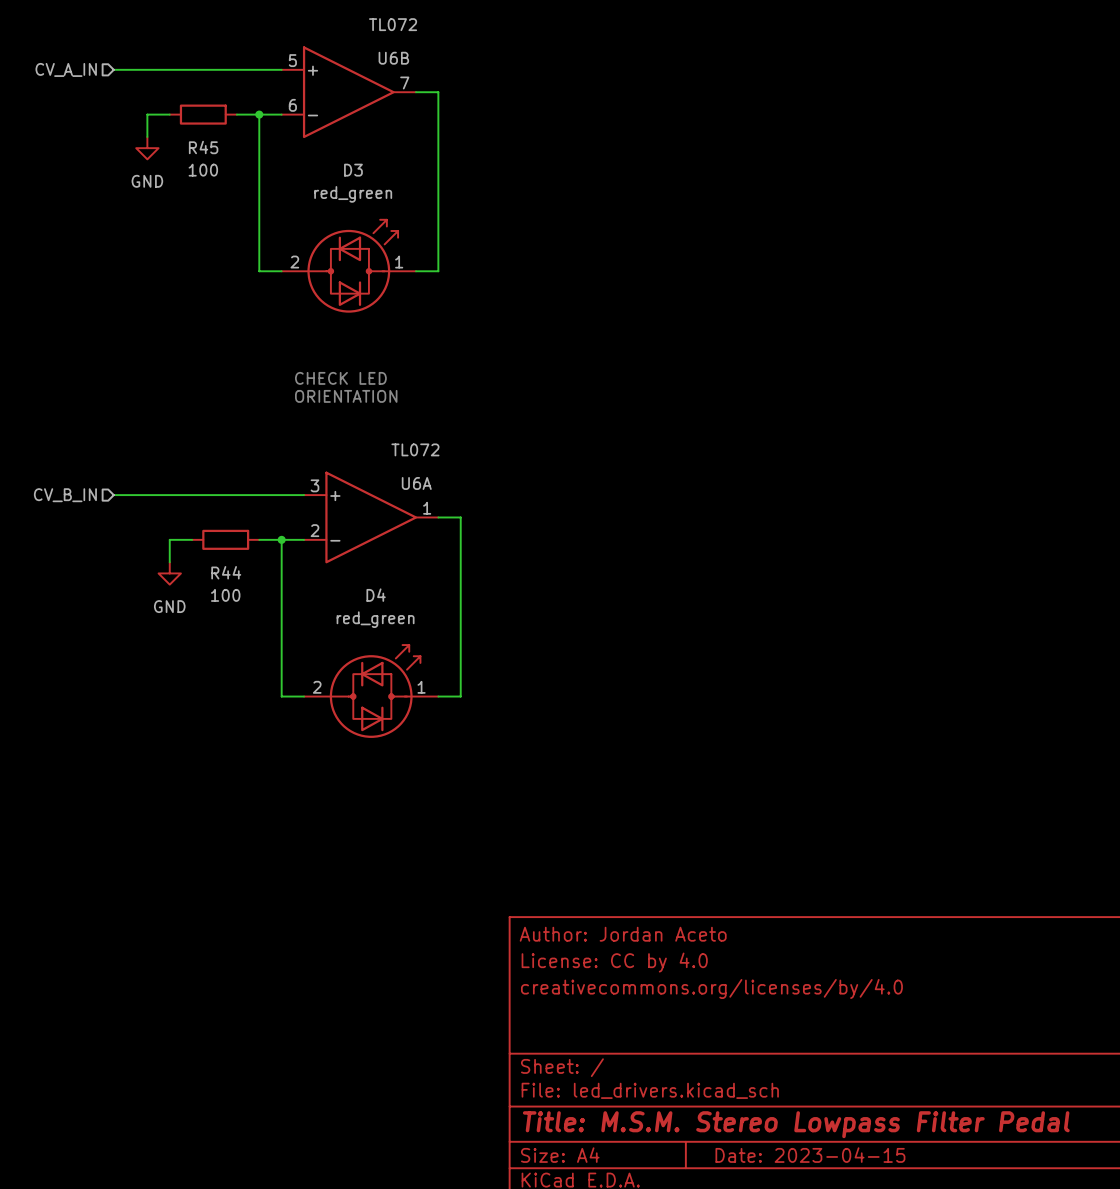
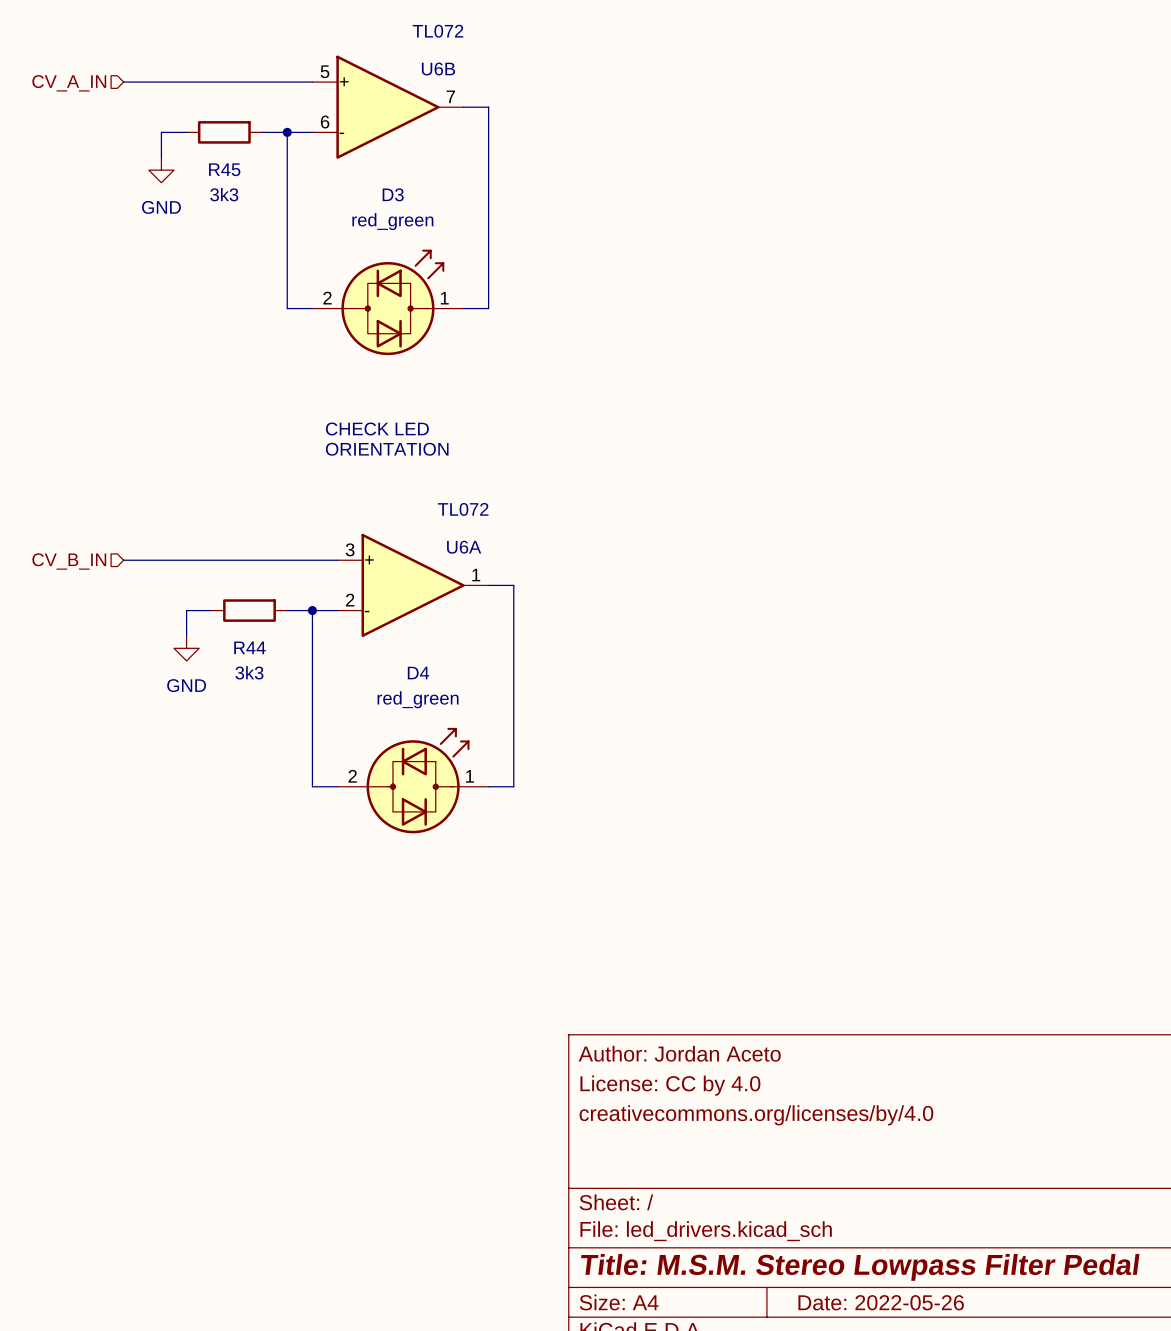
R45 value: 100 (203, 170) -> 3k3 (224, 194)
R44 value: 100 (225, 595) -> 3k3 (249, 672)
title block: Date: 2023-04-15 (810, 1155) -> Date: 2022-05-26 (881, 1302)

